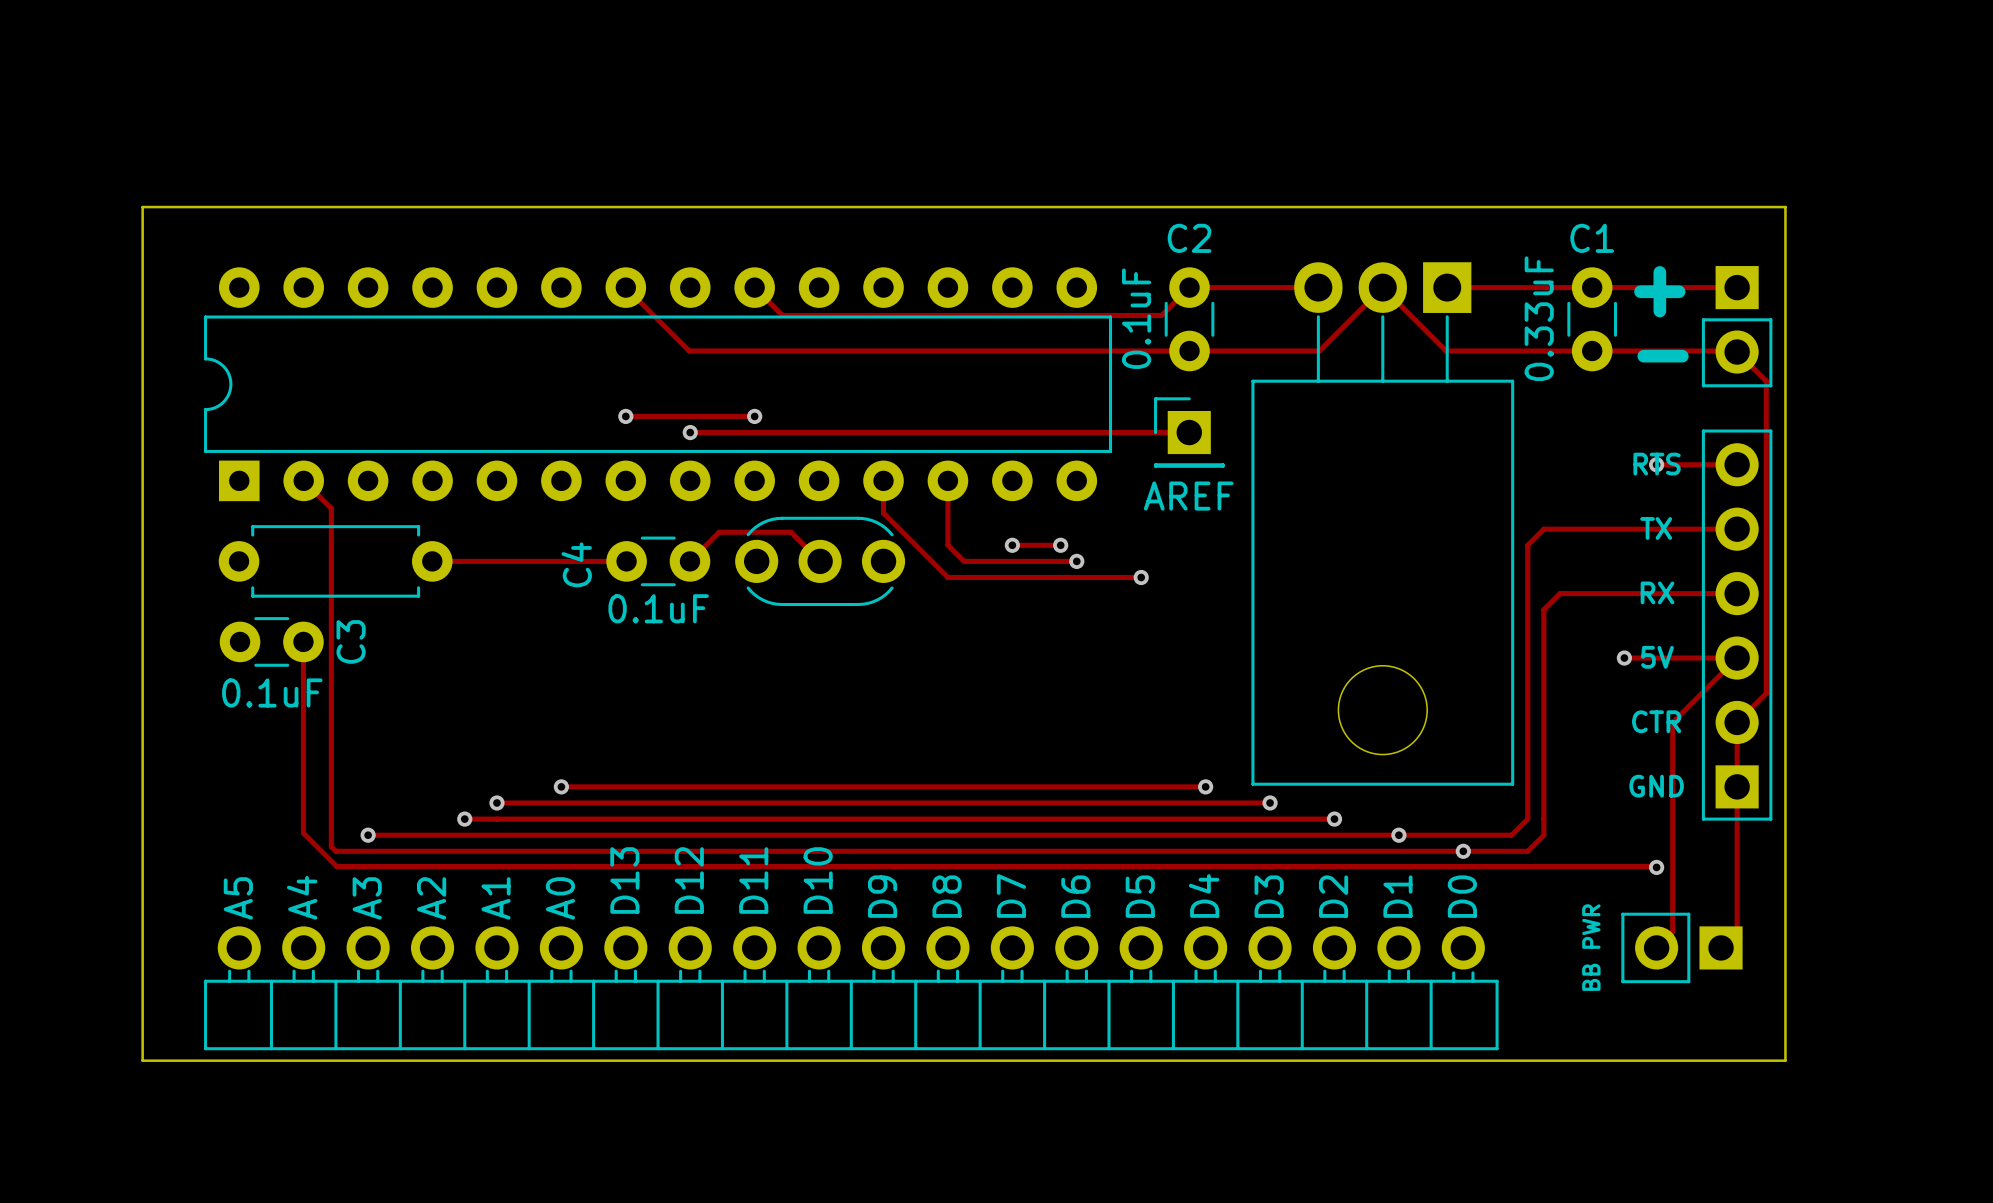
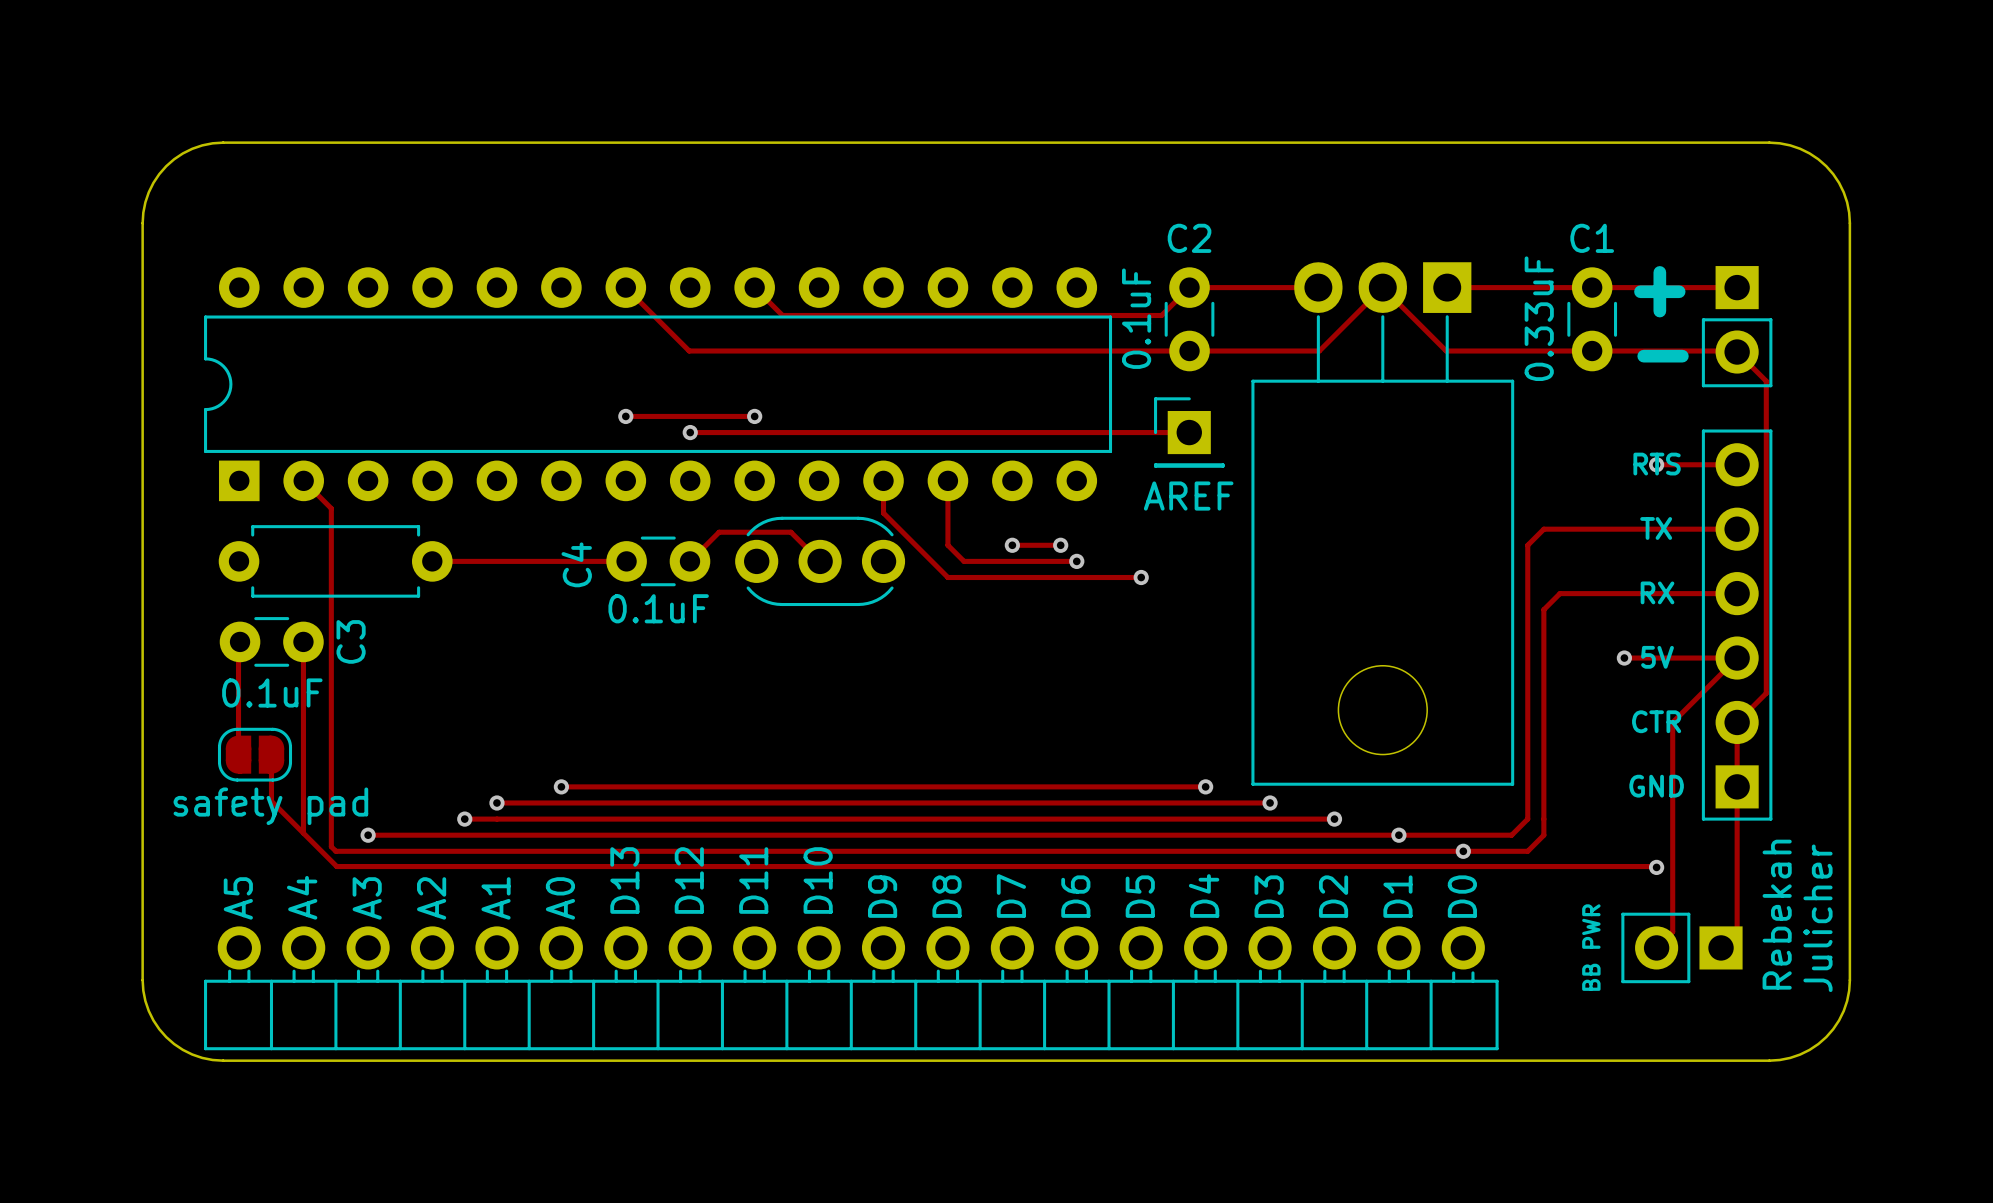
board edge: (142, 223) (142, 207) (1785, 207) (1785, 1060) (1769, 1060) -> (142, 223) (148, 192) (166, 166) (192, 148) (223, 142) (1769, 142) (1790, 145) (1809, 153) (1826, 166) (1839, 182) (1847, 202) (1849, 223) (1849, 980) (1843, 1010) (1826, 1037) (1800, 1054) (1769, 1060)
track: none -> (240, 641) (238, 643) (238, 754)
safety pad: none -> (255, 754)
track: none -> (271, 754) (271, 801) (303, 833)
text: none -> Rebekah (1777, 914)
text: none -> Julicher (1817, 918)
board edge: (142, 980) (142, 1060) (223, 1060) -> (142, 980) (148, 1010) (166, 1037) (192, 1054) (223, 1060)

